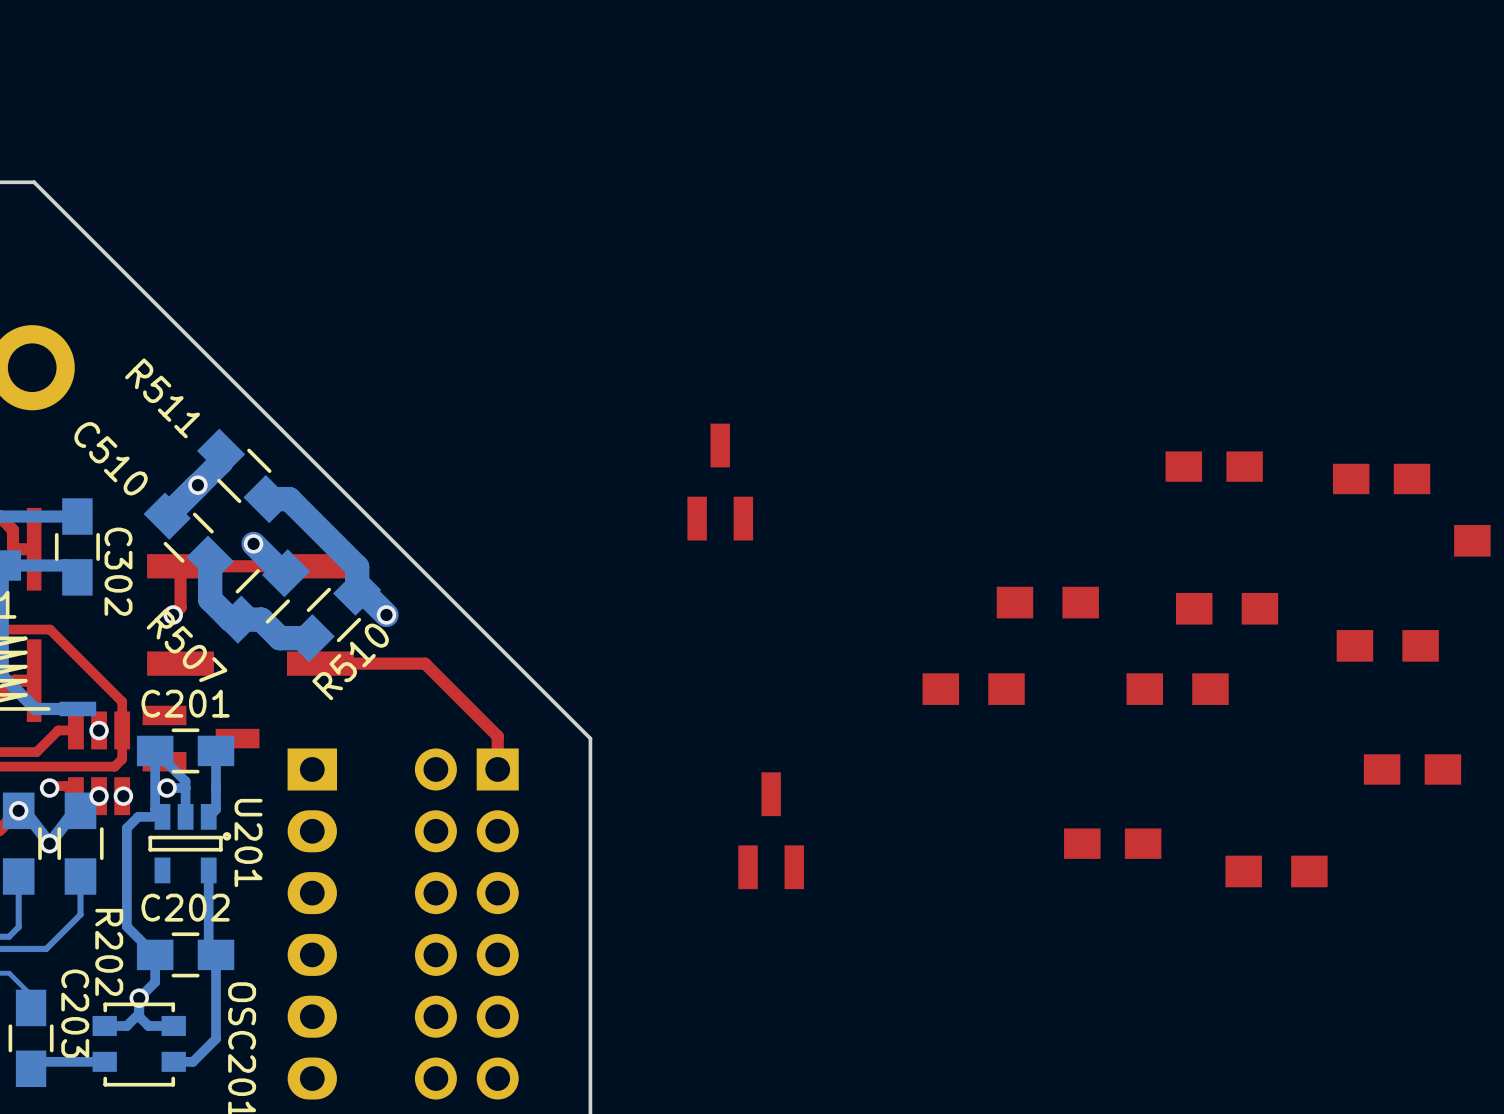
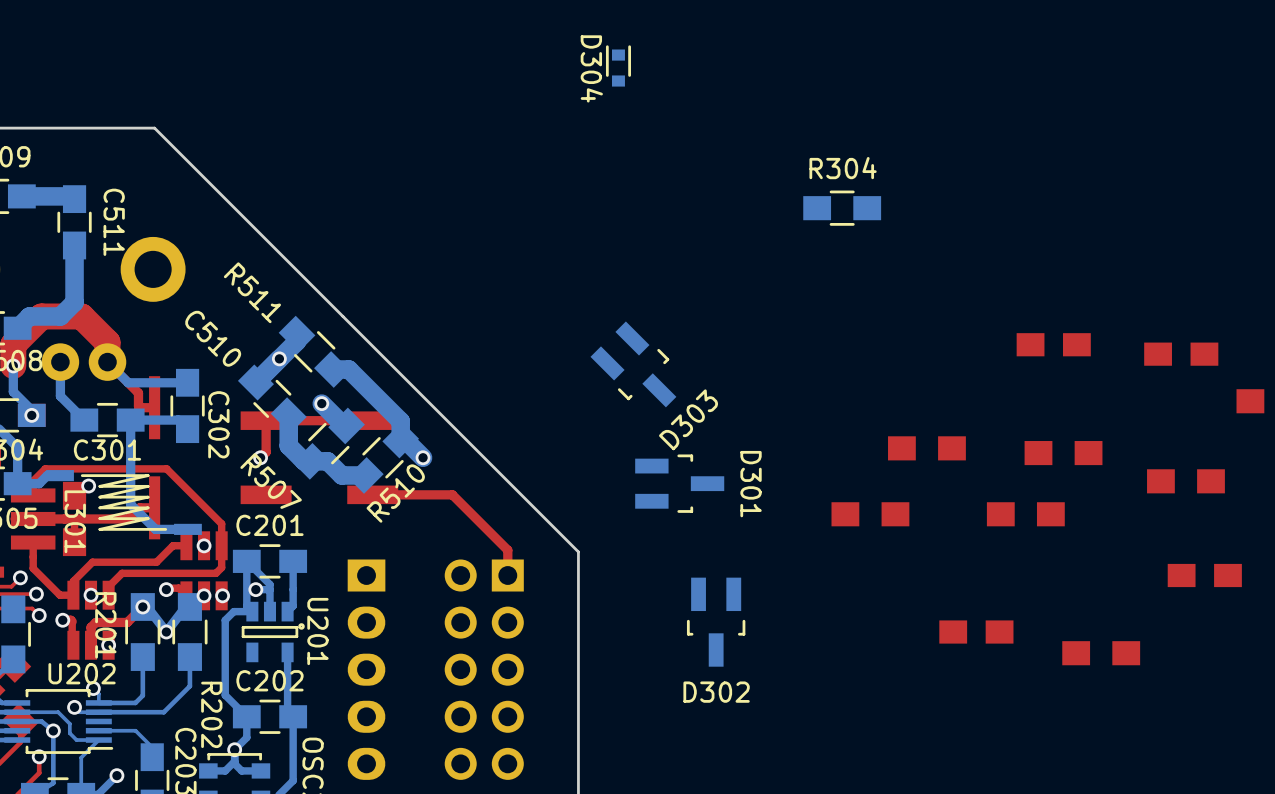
D304: none -> (618, 65)
R304: none -> (842, 208)
D301 side: top (720, 482) -> bottom (679, 483)
D303 side: top (201, 738) -> bottom (633, 364)
D302 side: top (771, 830) -> bottom (716, 622)

